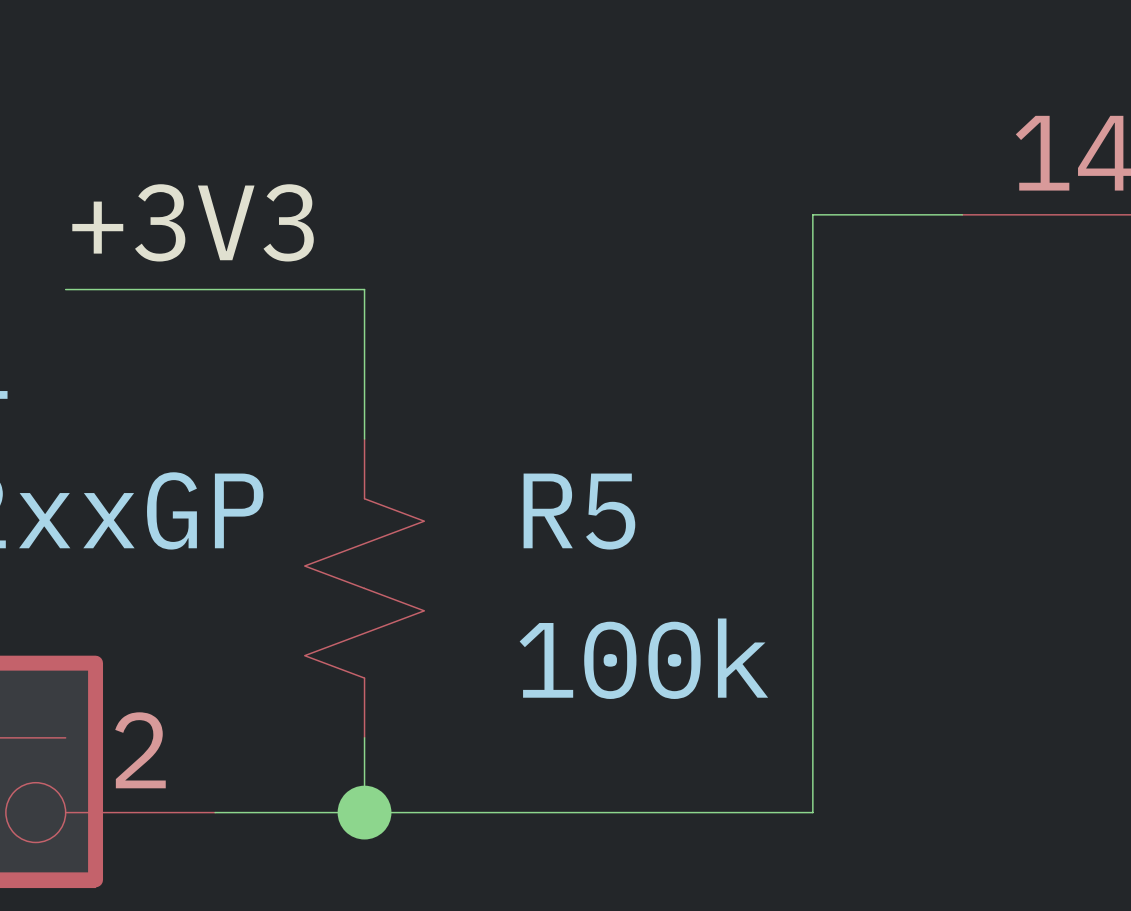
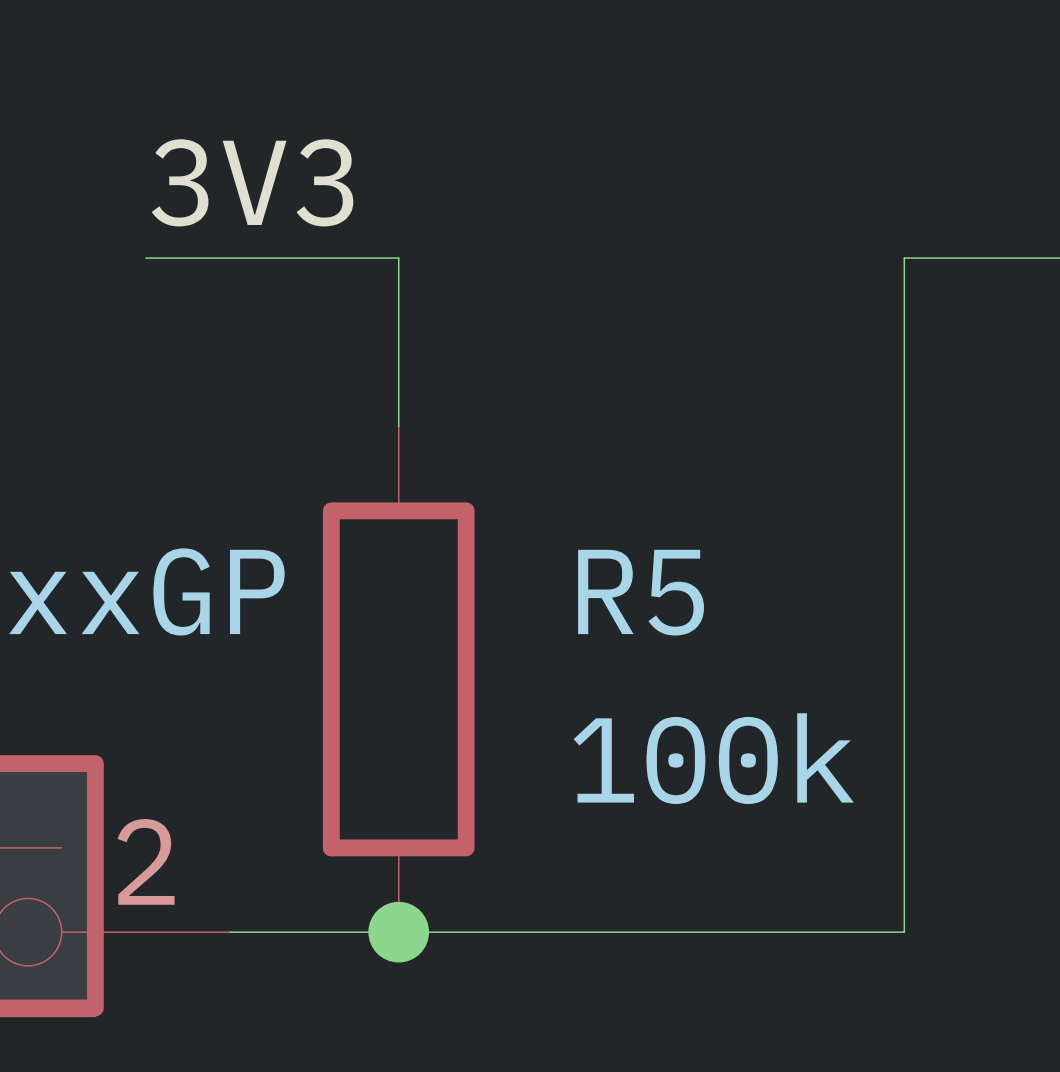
label: +3V3 (193, 222) -> 3V3 (252, 182)
wire: (65, 289) (364, 289) -> (145, 258) (398, 258) (398, 342)
R5 symbol: [304, 438, 425, 738] -> [322, 426, 475, 933]

